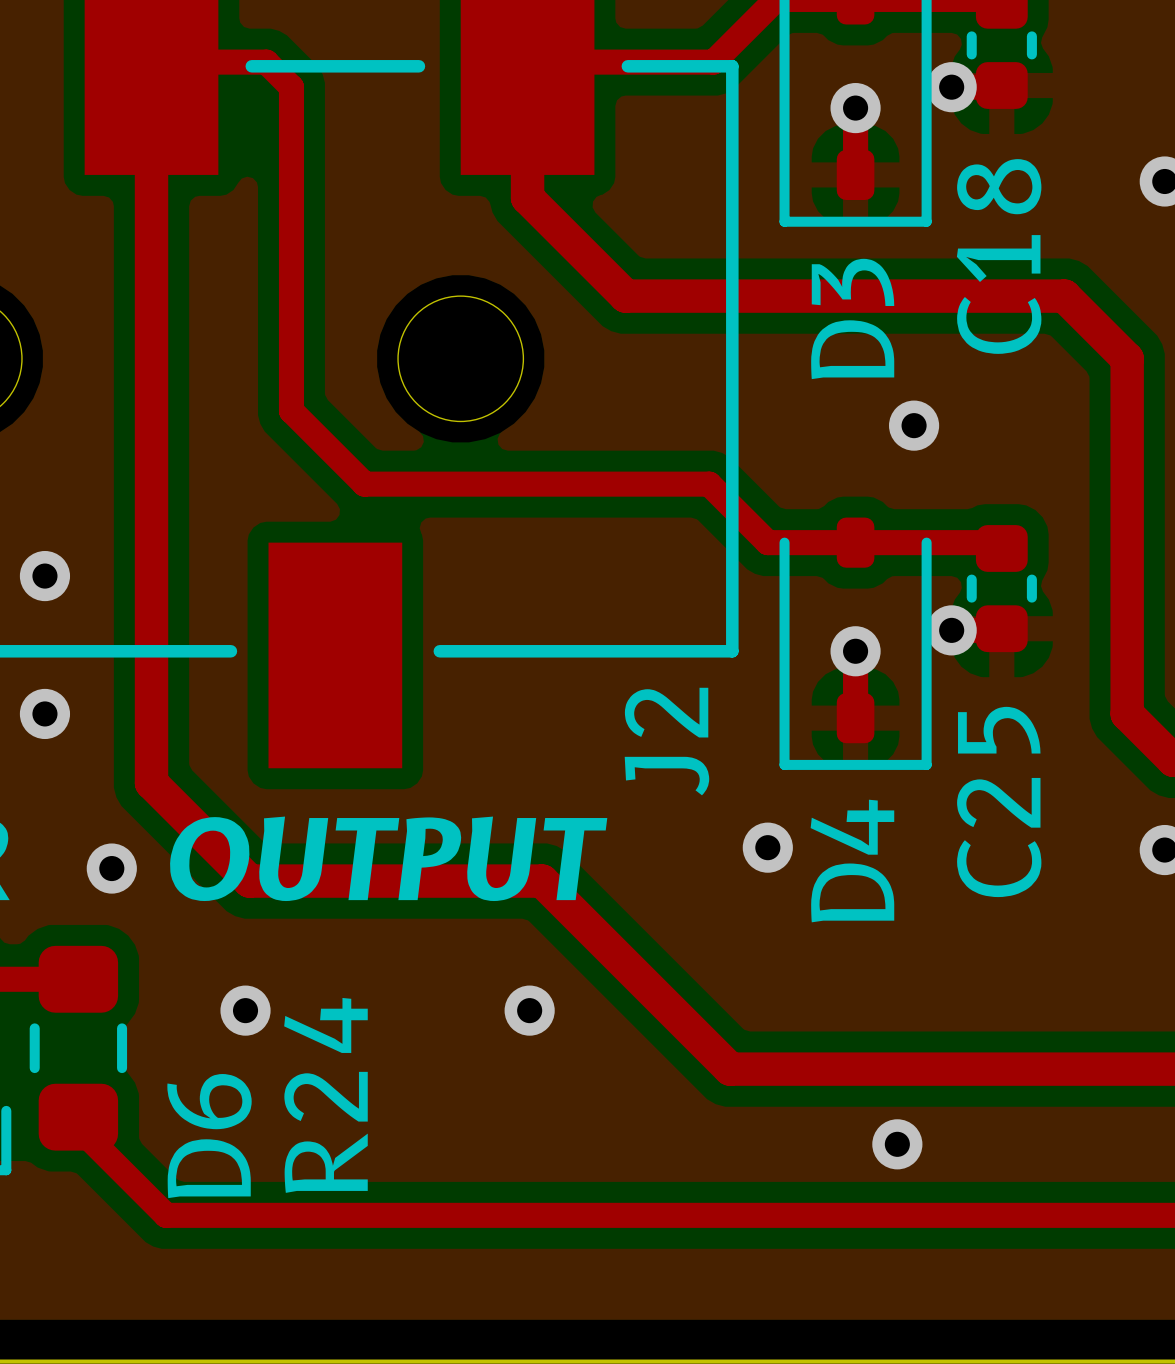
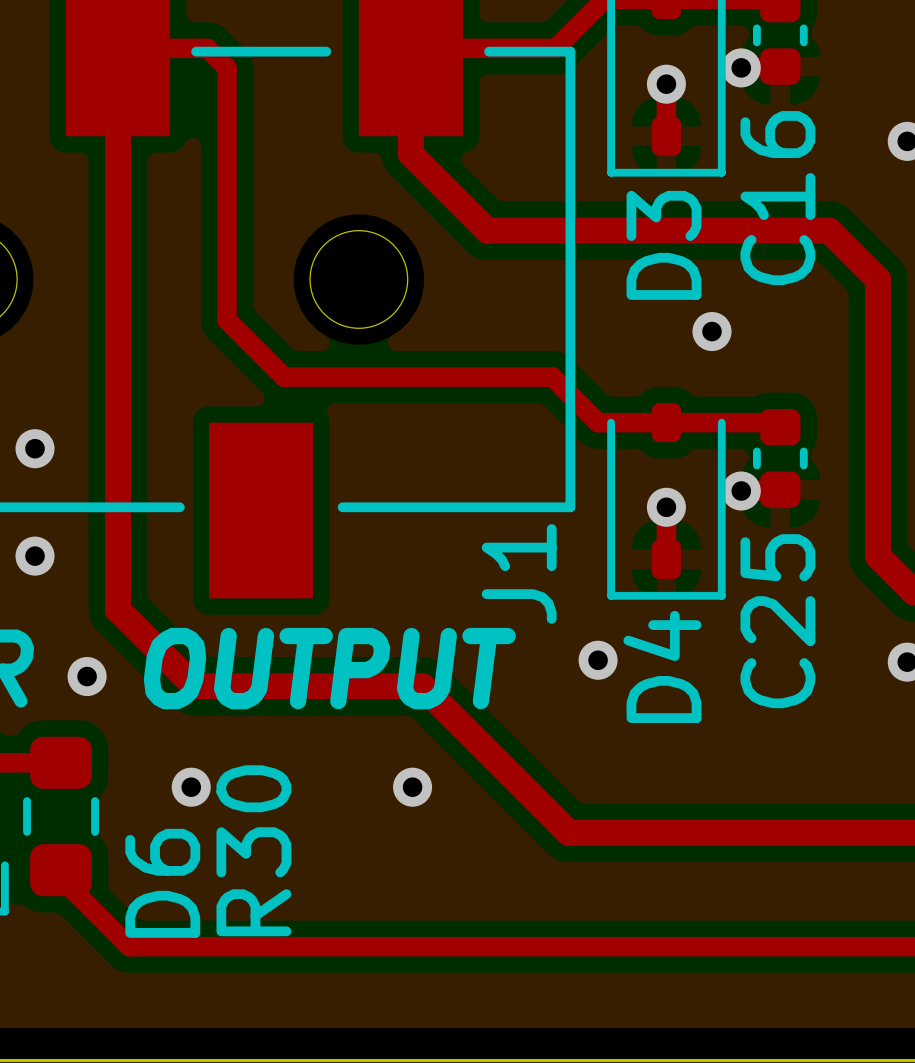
C18 name: C18 (999, 256) -> C16 (777, 198)
J2 name: J2 (666, 741) -> J1 (519, 573)
R24 name: R24 (325, 1095) -> R30 (253, 850)
via: (897, 1144) -> none

